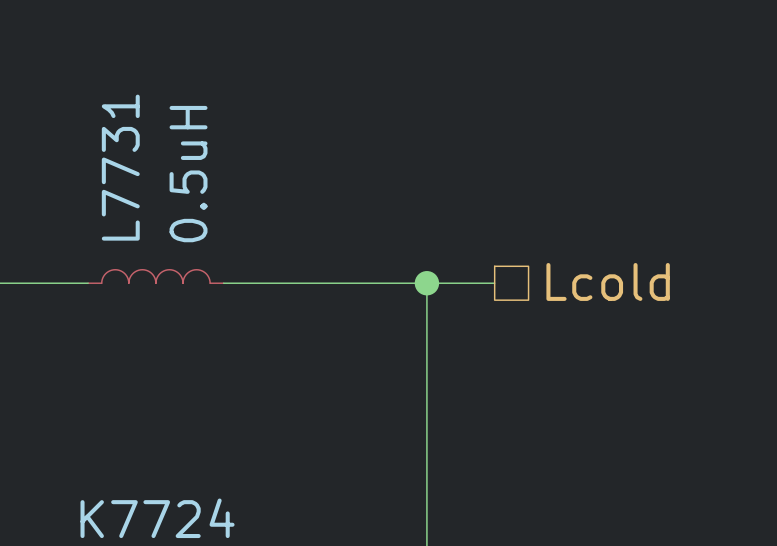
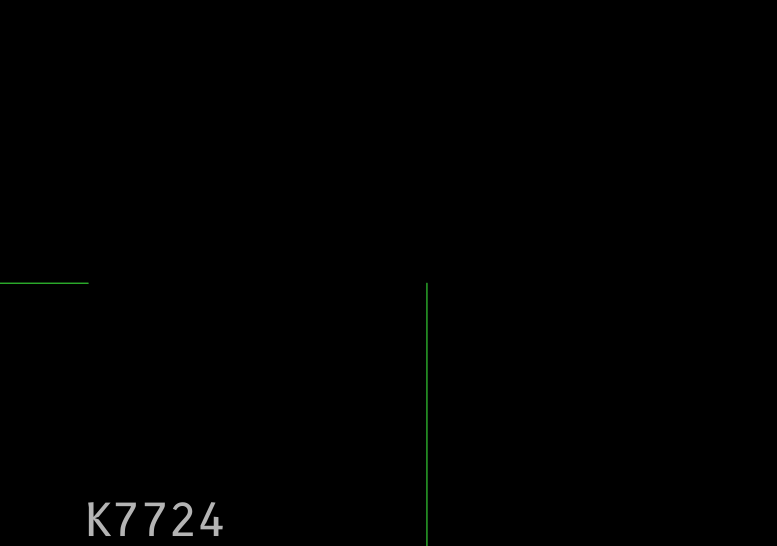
L7731: 0.5uH (155, 276) -> none
hierarchical label: Lcold (608, 281) -> none
wire: (223, 283) (494, 283) -> none
junction: (426, 283) -> none

